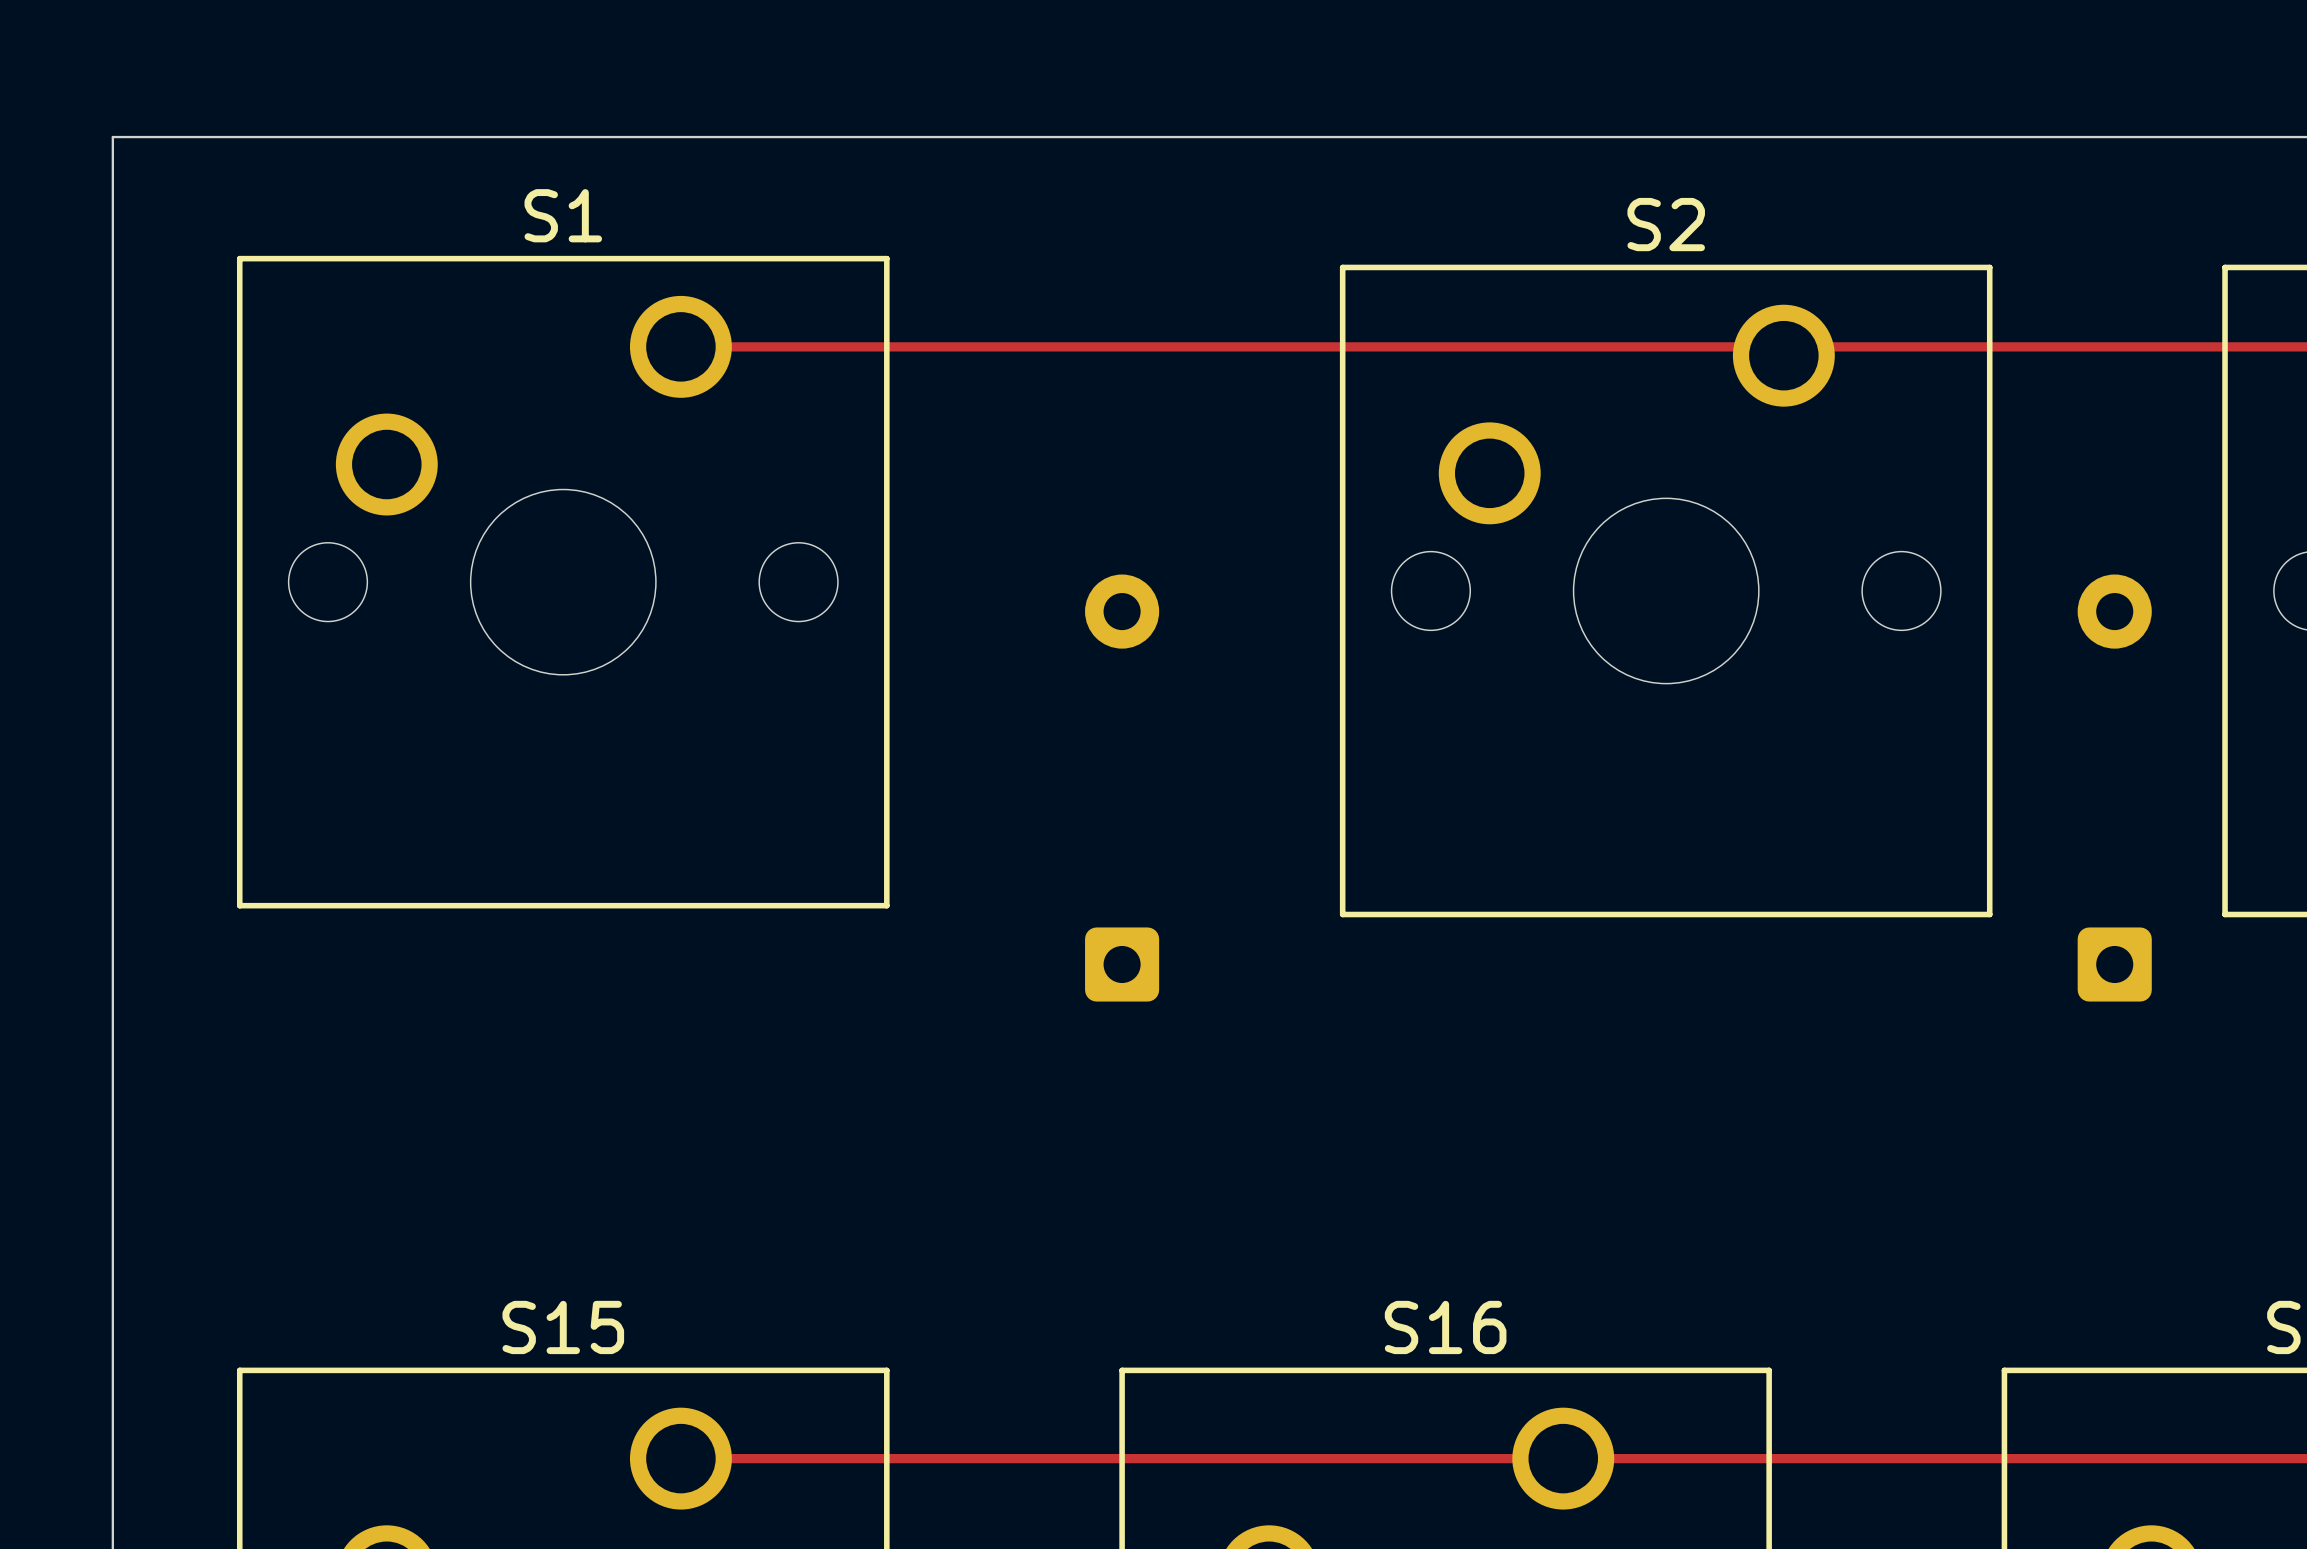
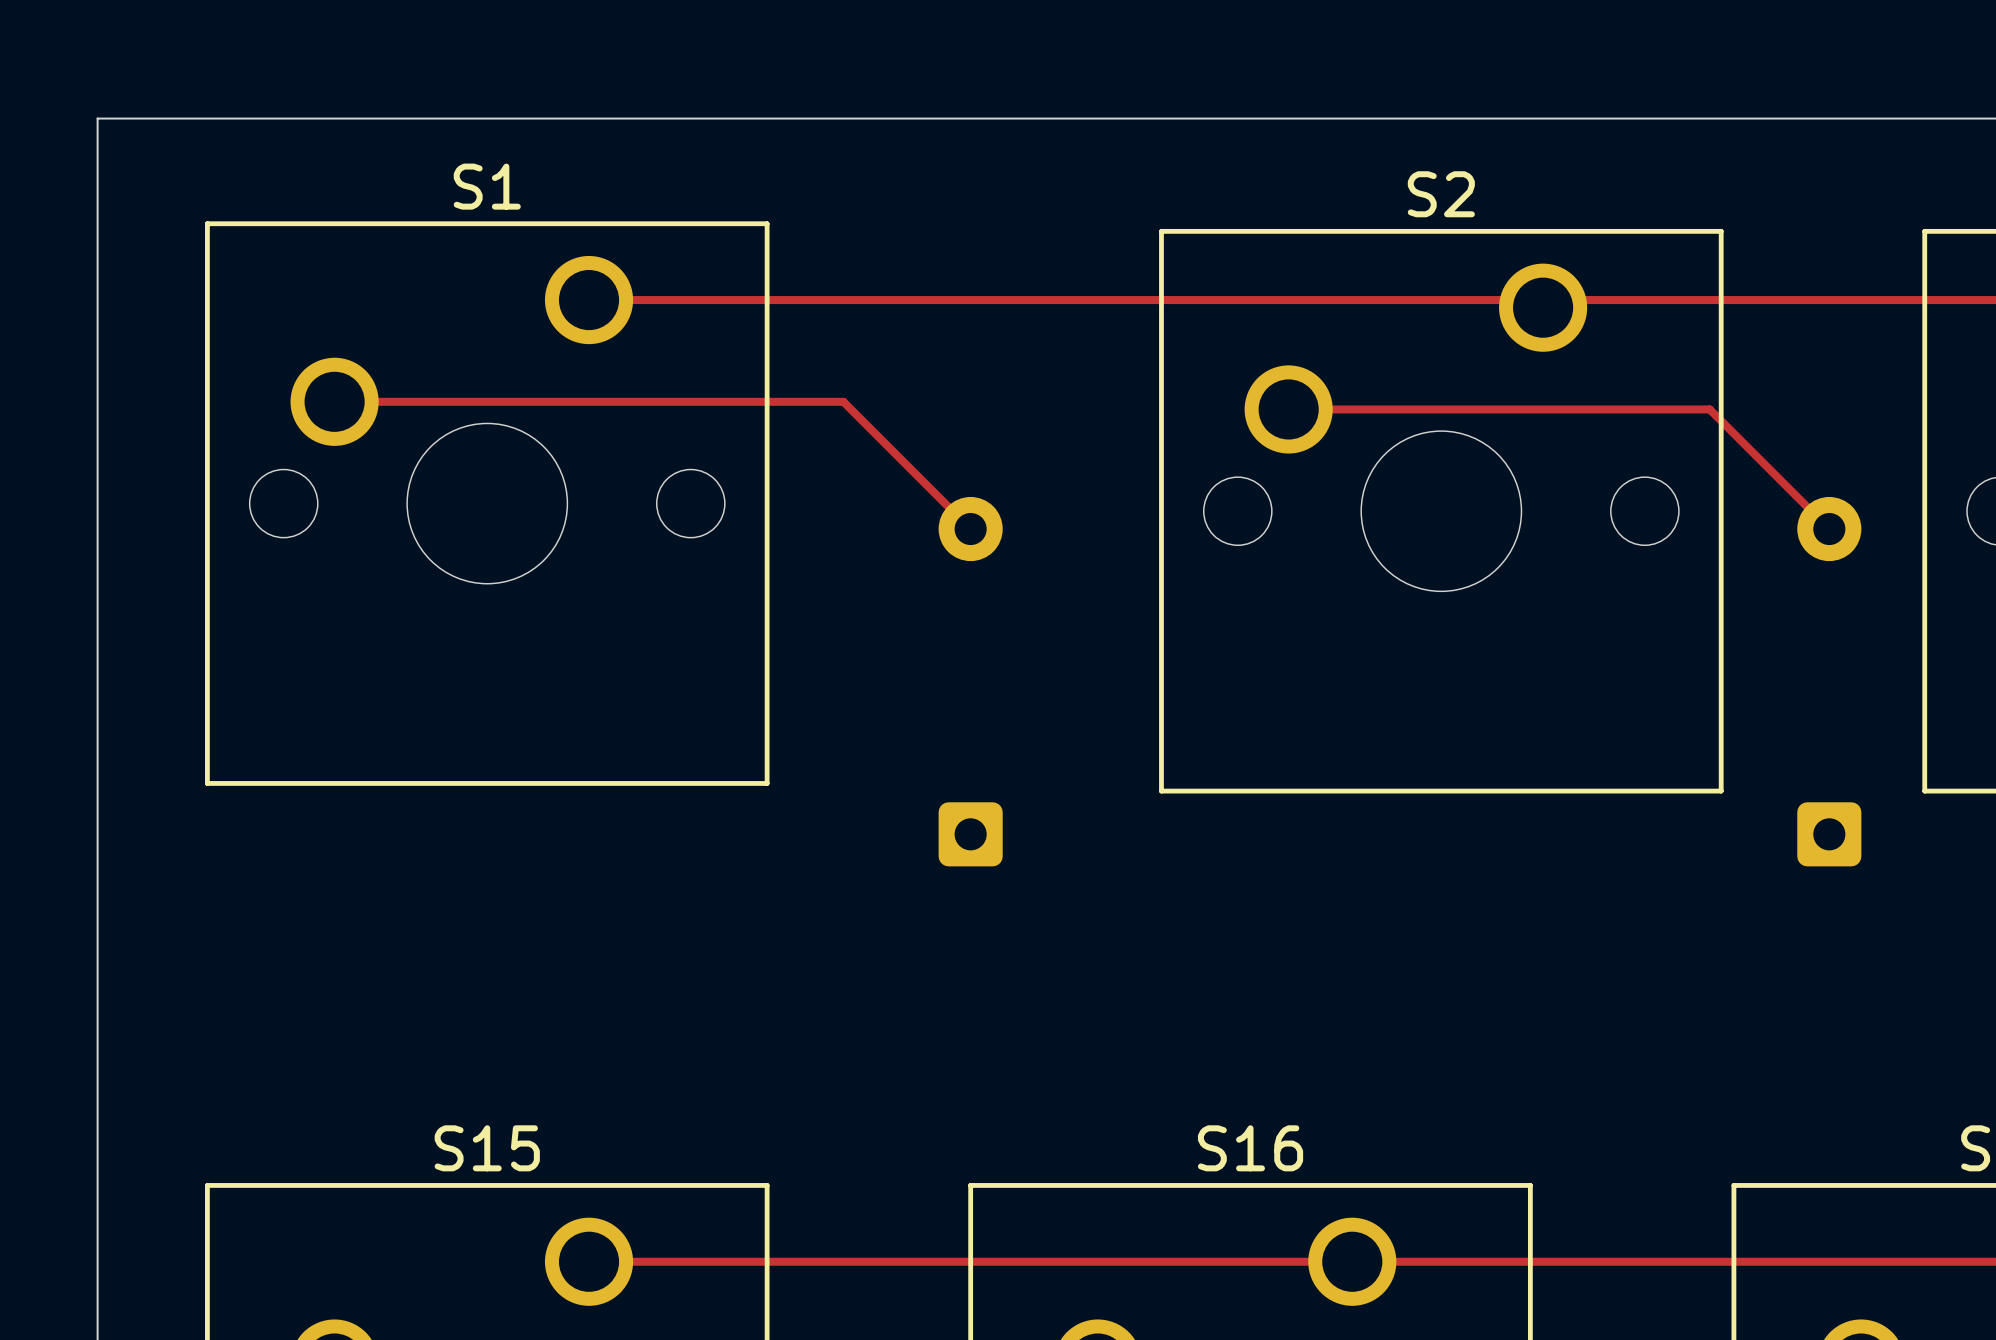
track: none -> (334, 401) (843, 401) (970, 529)
track: none -> (1288, 409) (1709, 409) (1829, 529)

